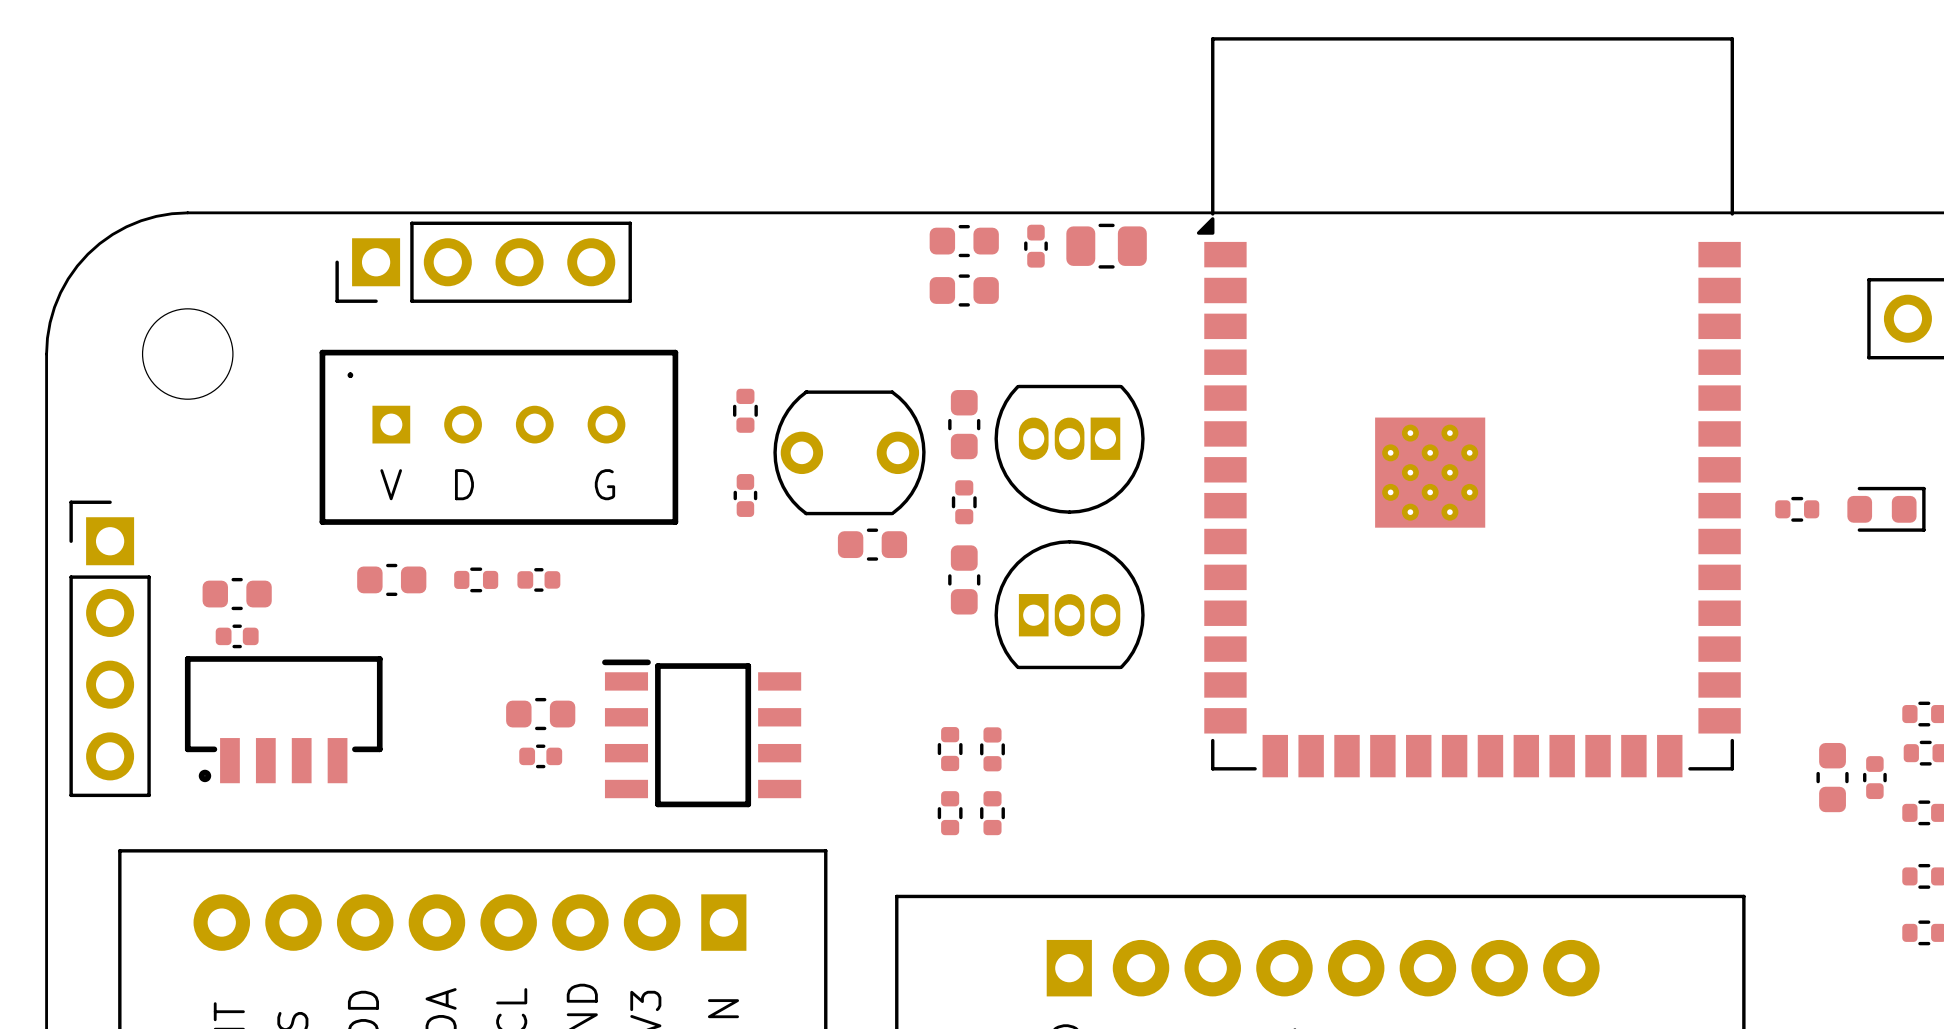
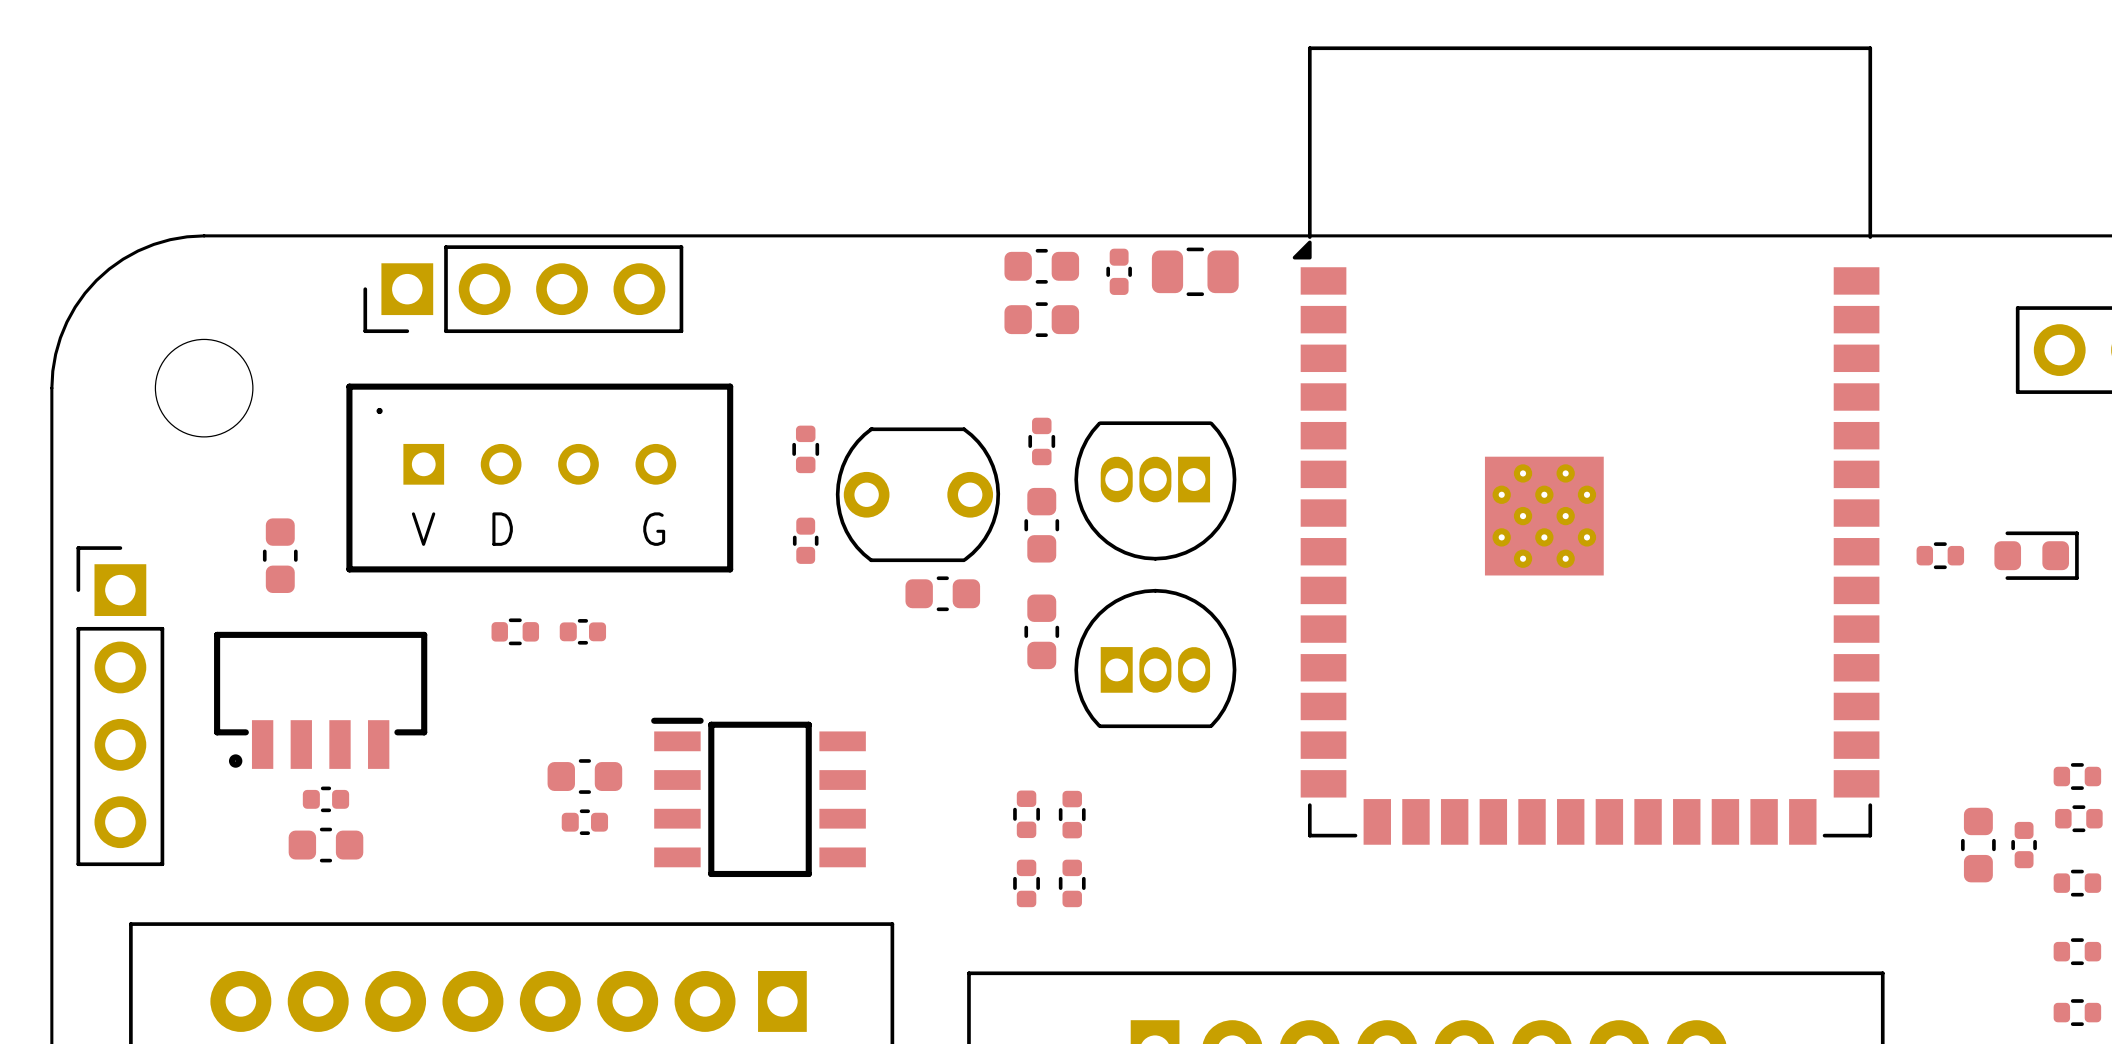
part footprint: [948, 390, 981, 460] -> [1028, 417, 1056, 466]
part footprint: [951, 480, 977, 525] -> [1024, 487, 1060, 563]
part: none -> (280, 555)
part: (391, 579) -> none
part: (237, 594) -> none
part: (237, 636) -> none
part: none -> (320, 700)
part footprint: [184, 656, 383, 784] -> [302, 786, 350, 813]
part: none -> (325, 845)

